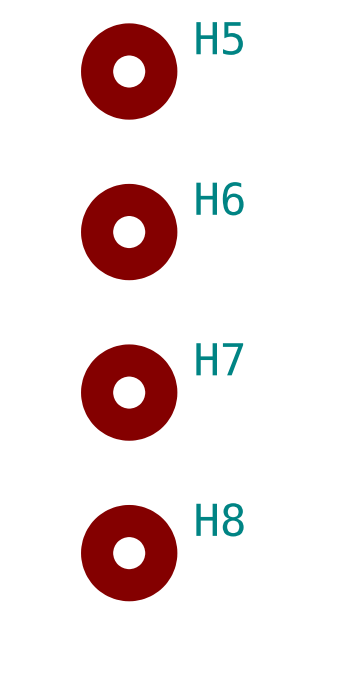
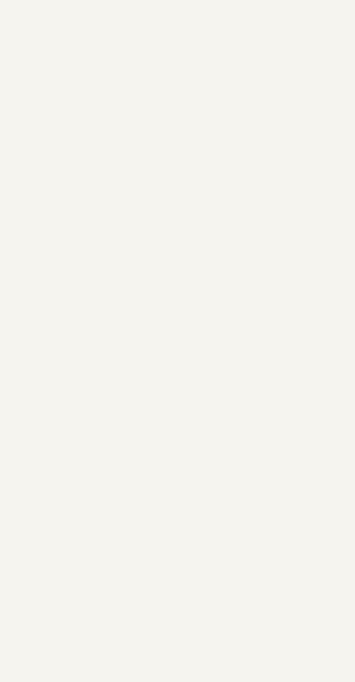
H5: (129, 71) -> none
H6: (129, 232) -> none
H7: (129, 392) -> none
H8: (129, 553) -> none

